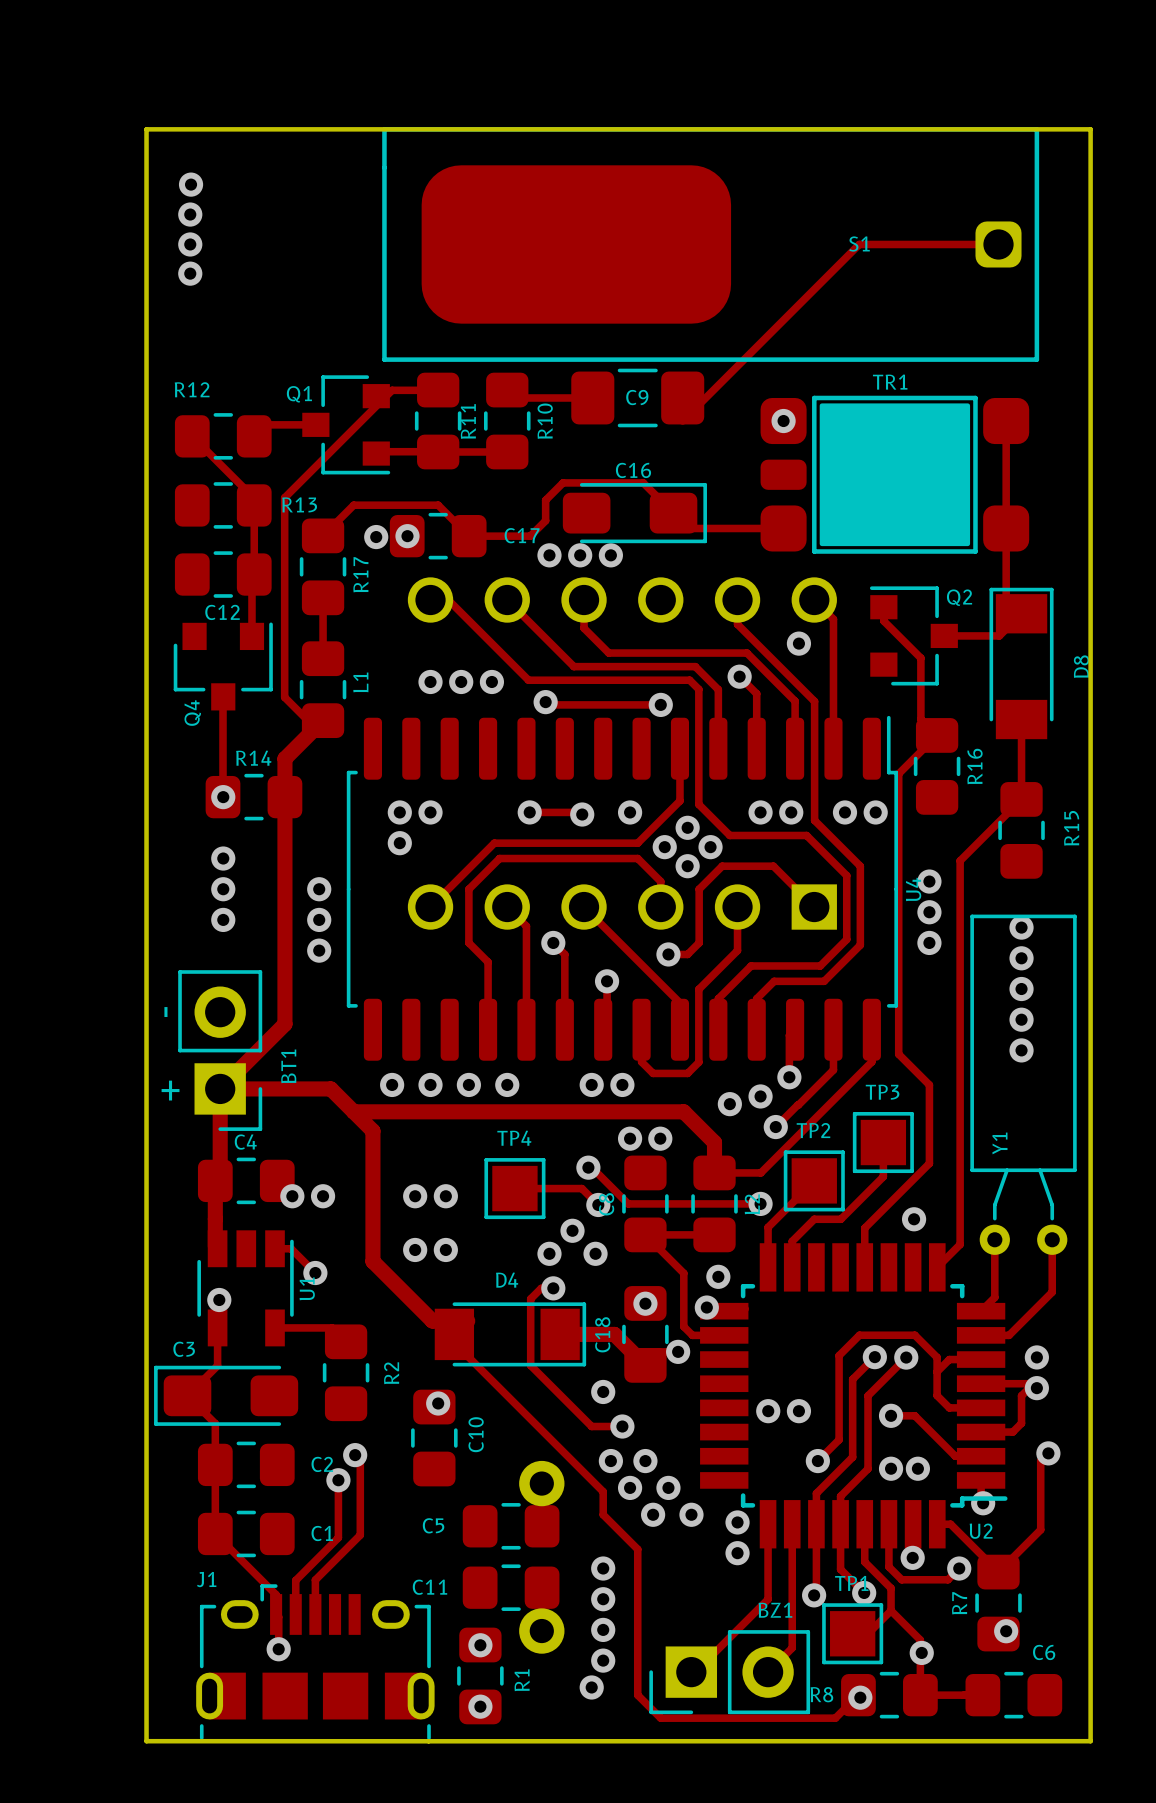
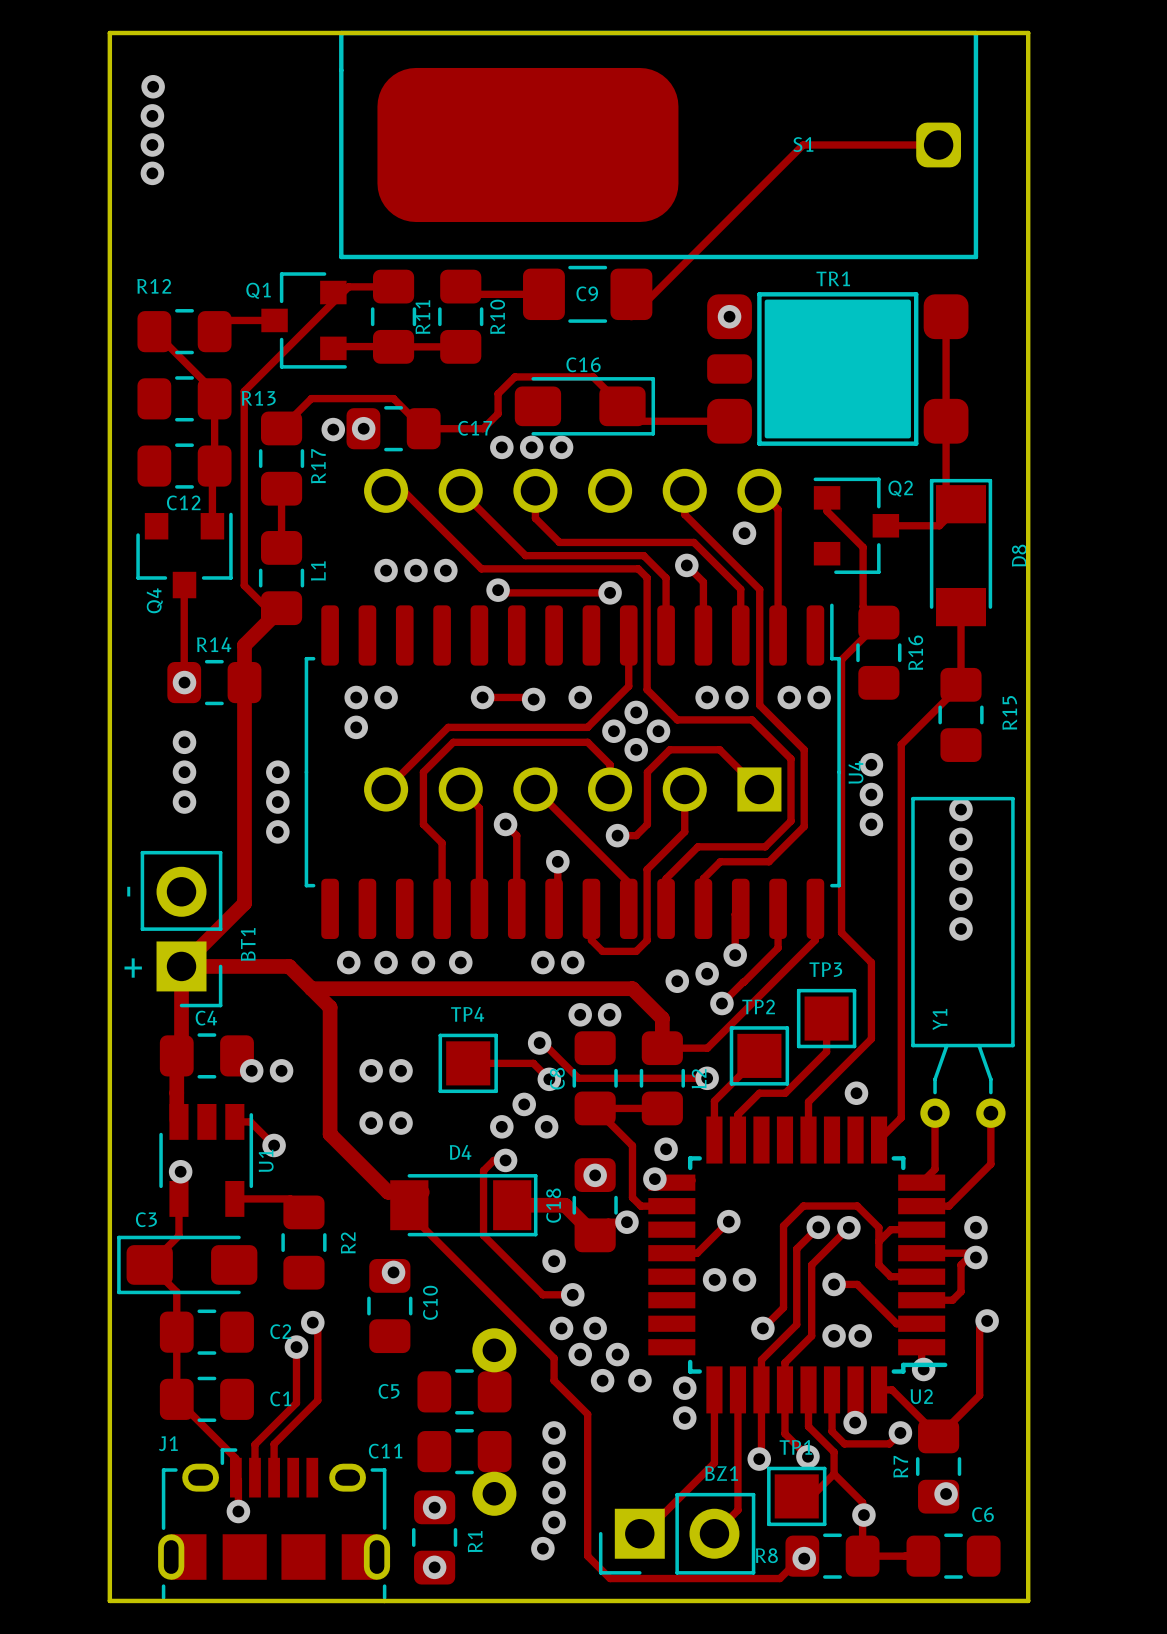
track: none -> (728, 1221) (697, 1253) (671, 1253)
via: none -> (728, 1221)

